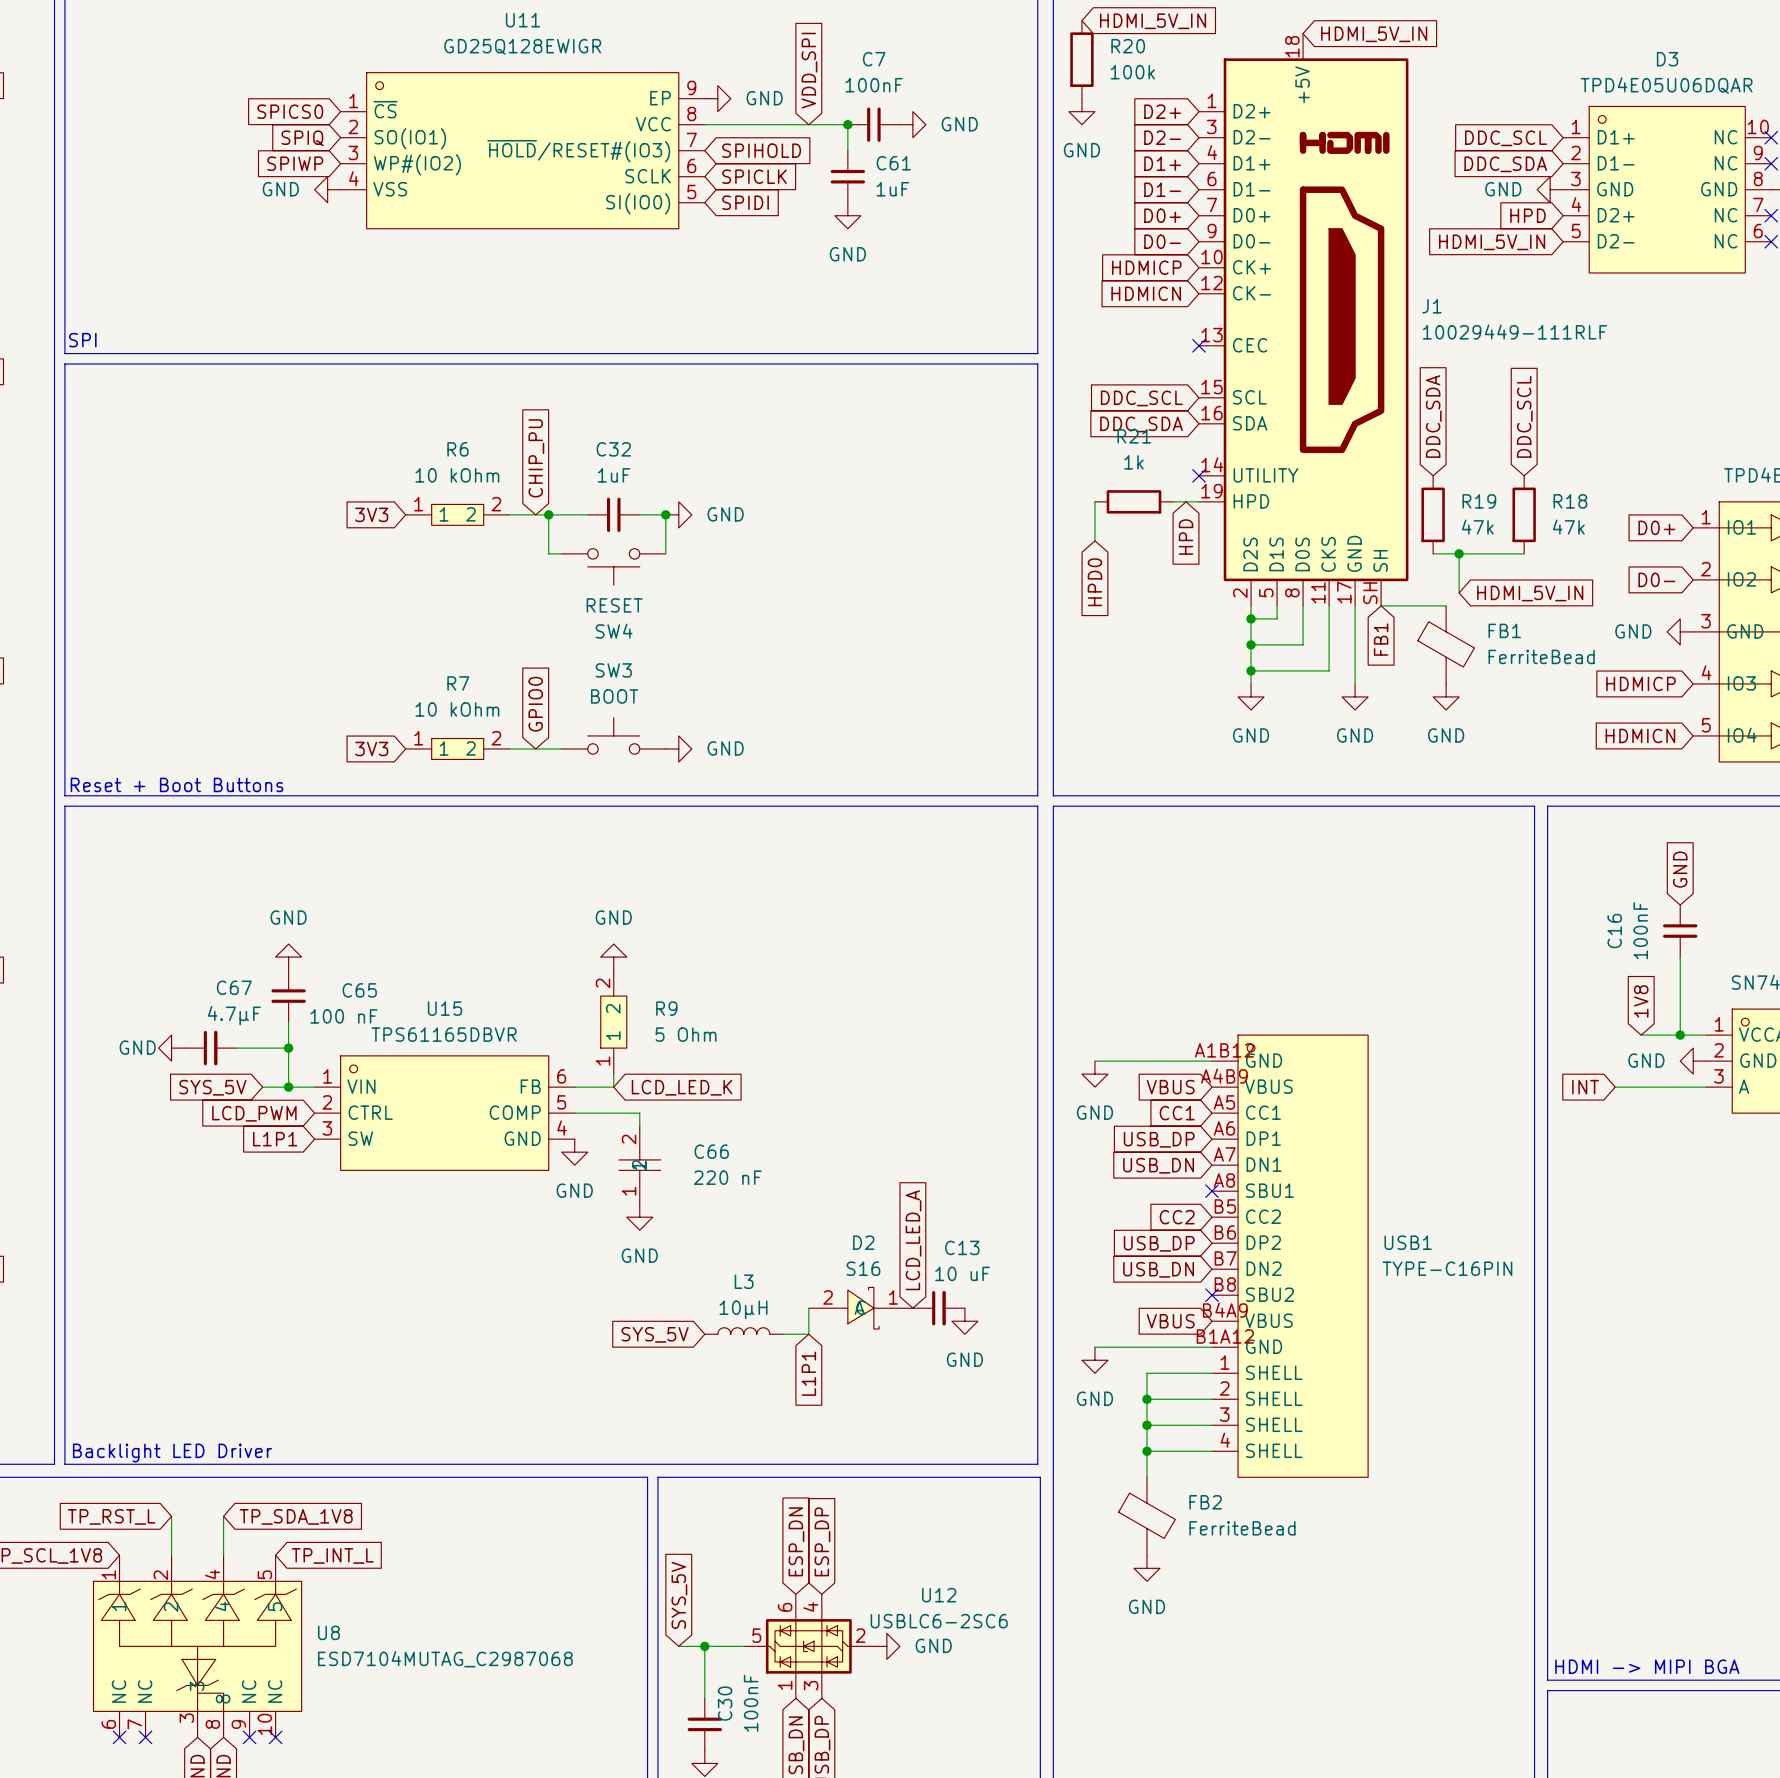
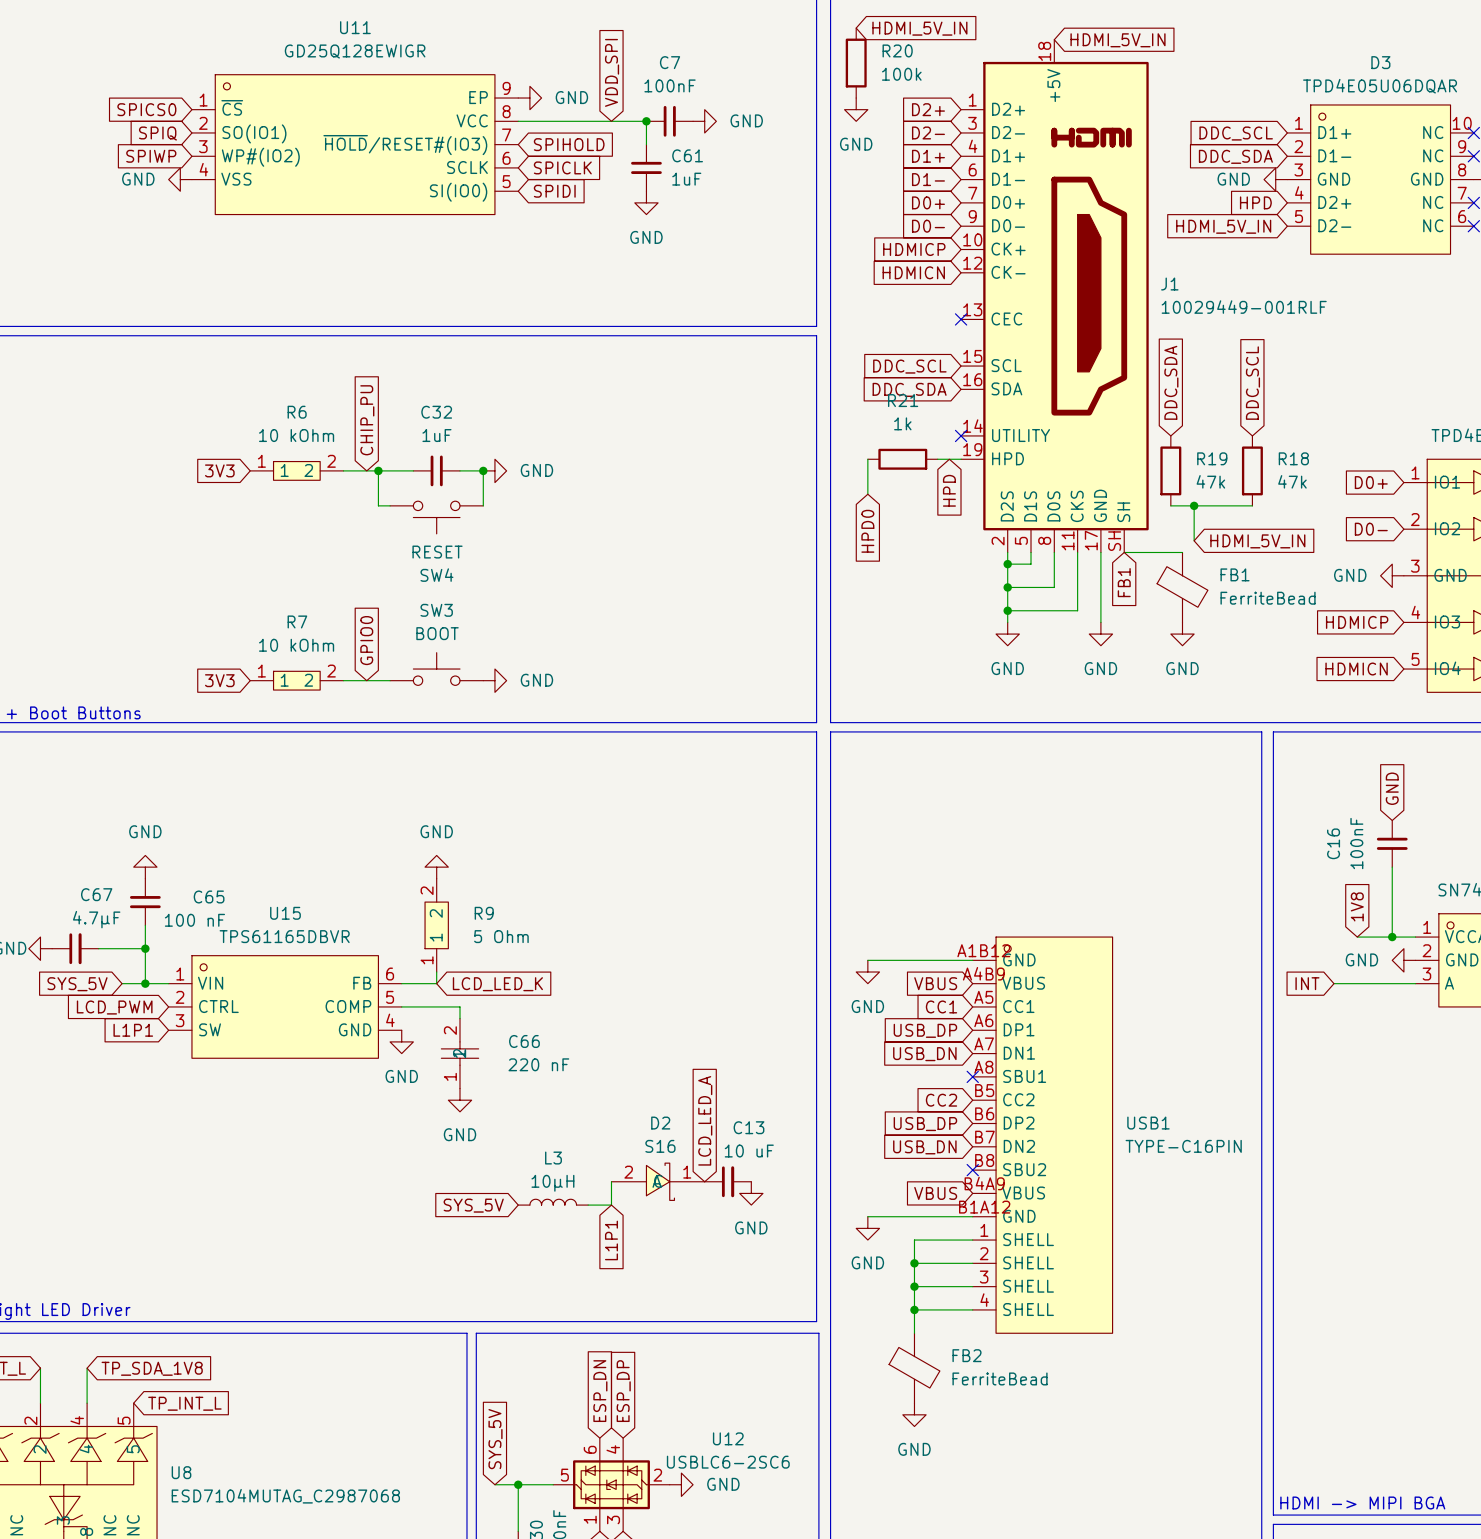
J1 value: 10029449-111RLF (1514, 331) -> 10029449-001RLF (1244, 307)

